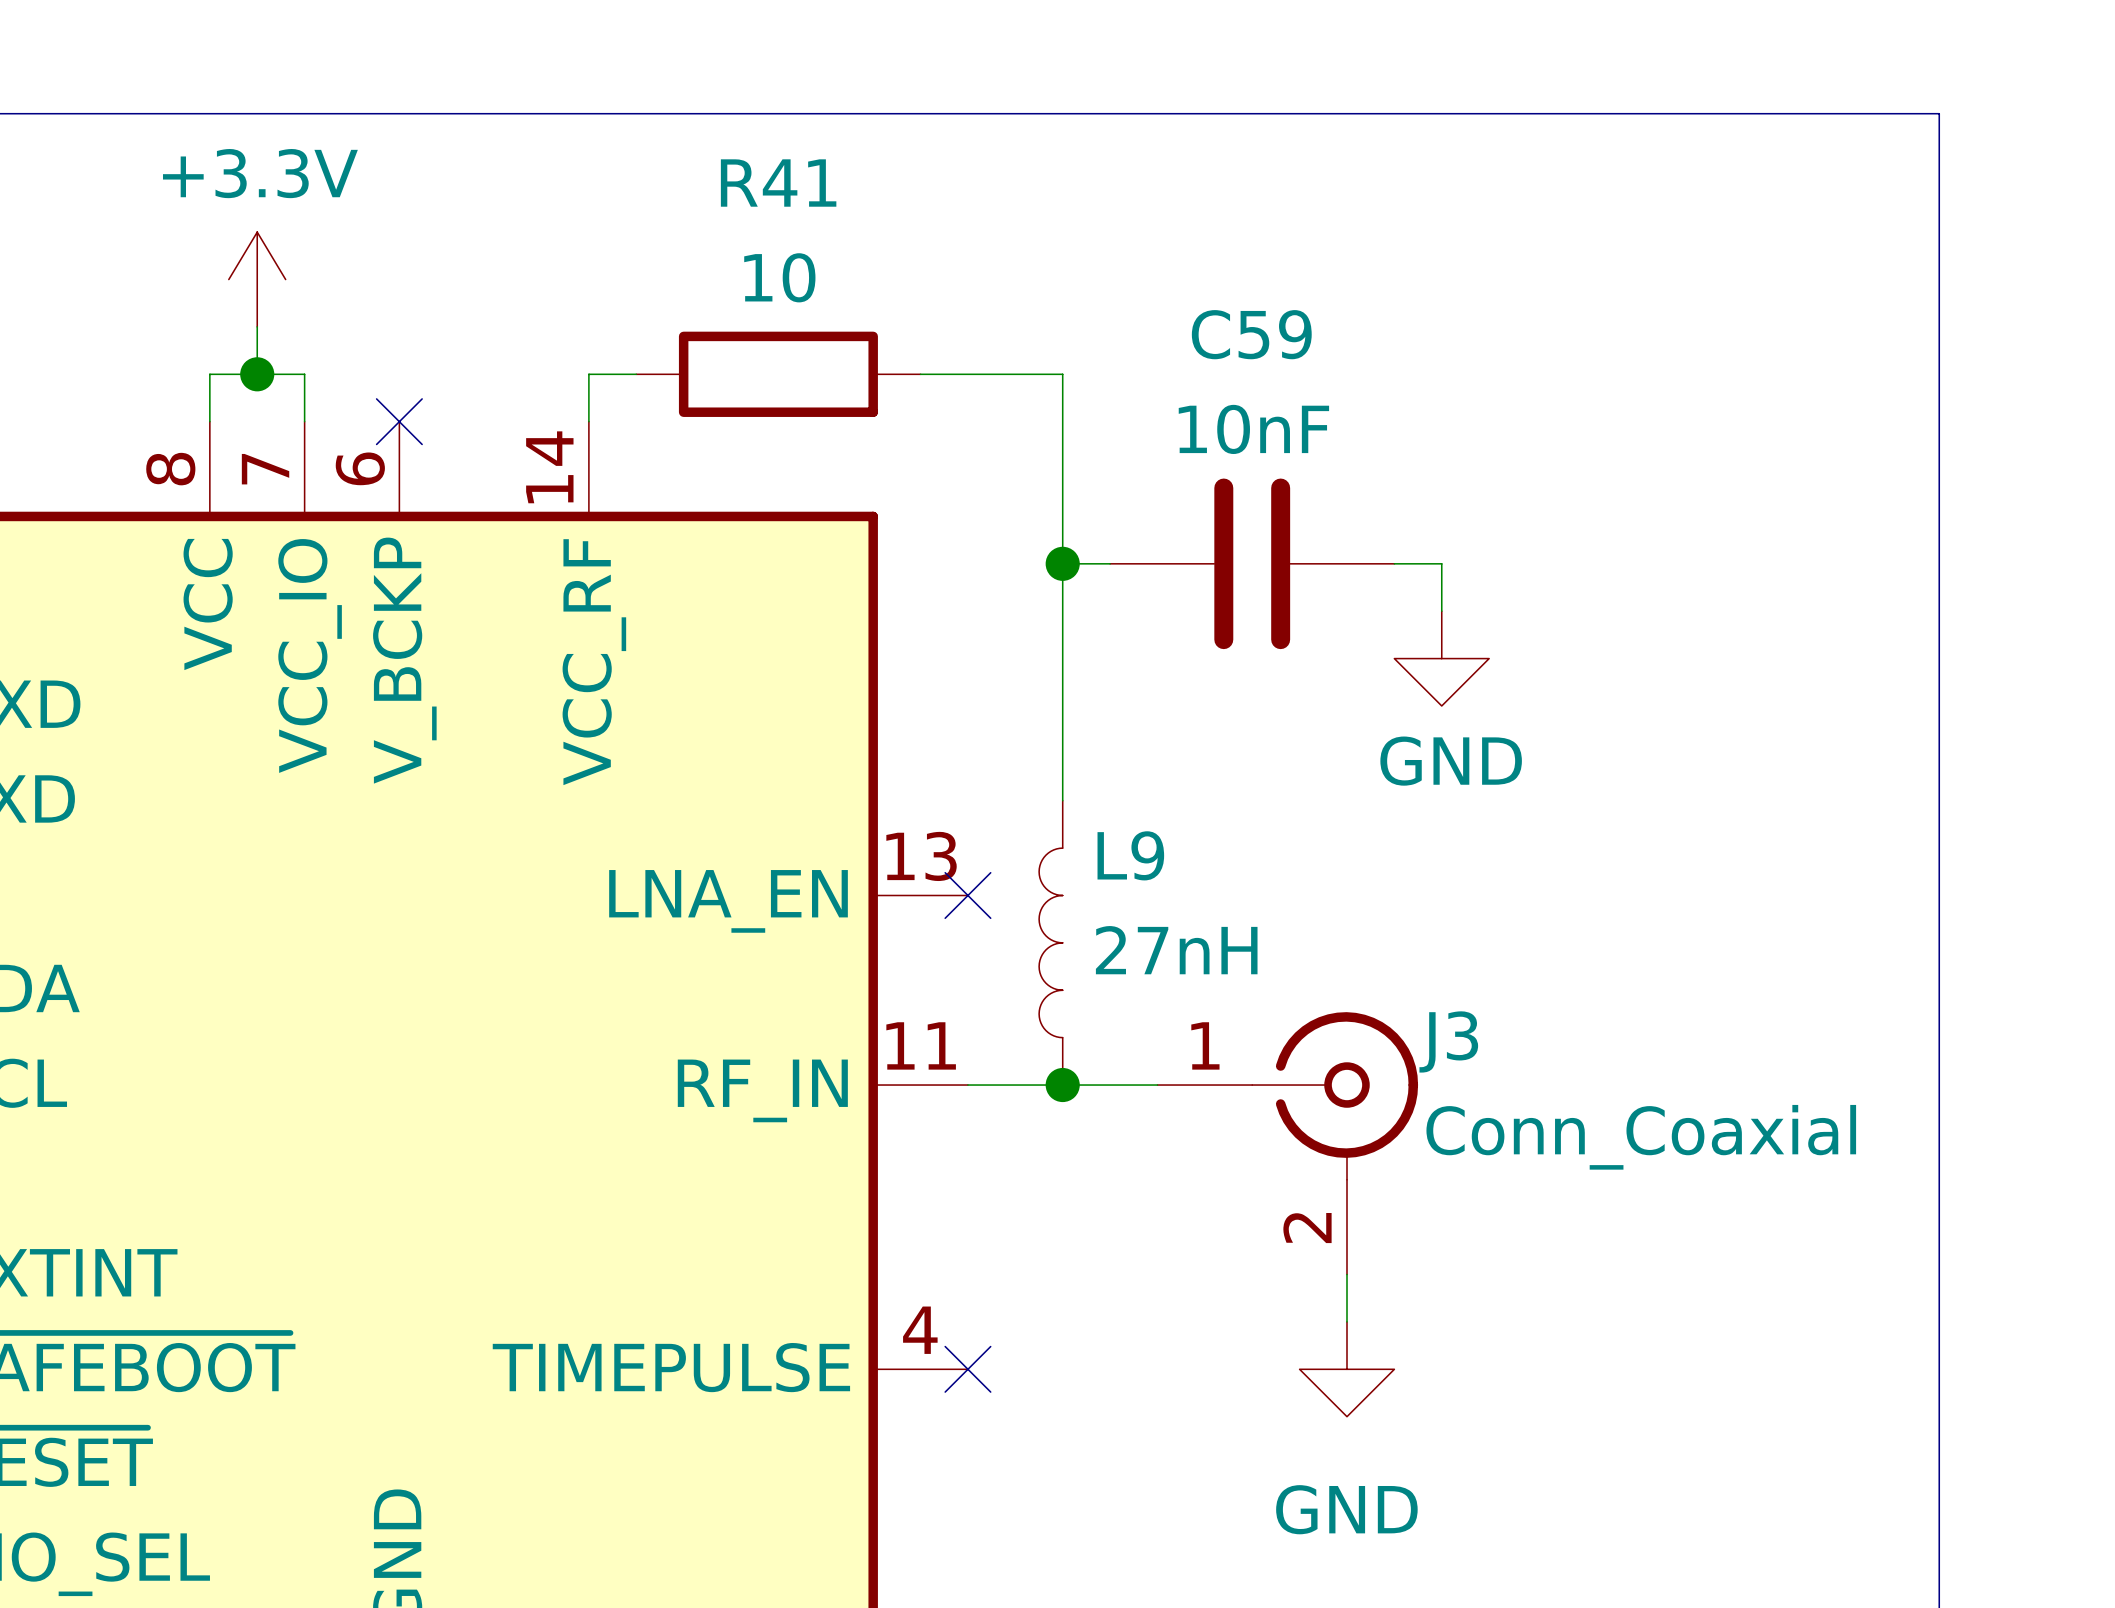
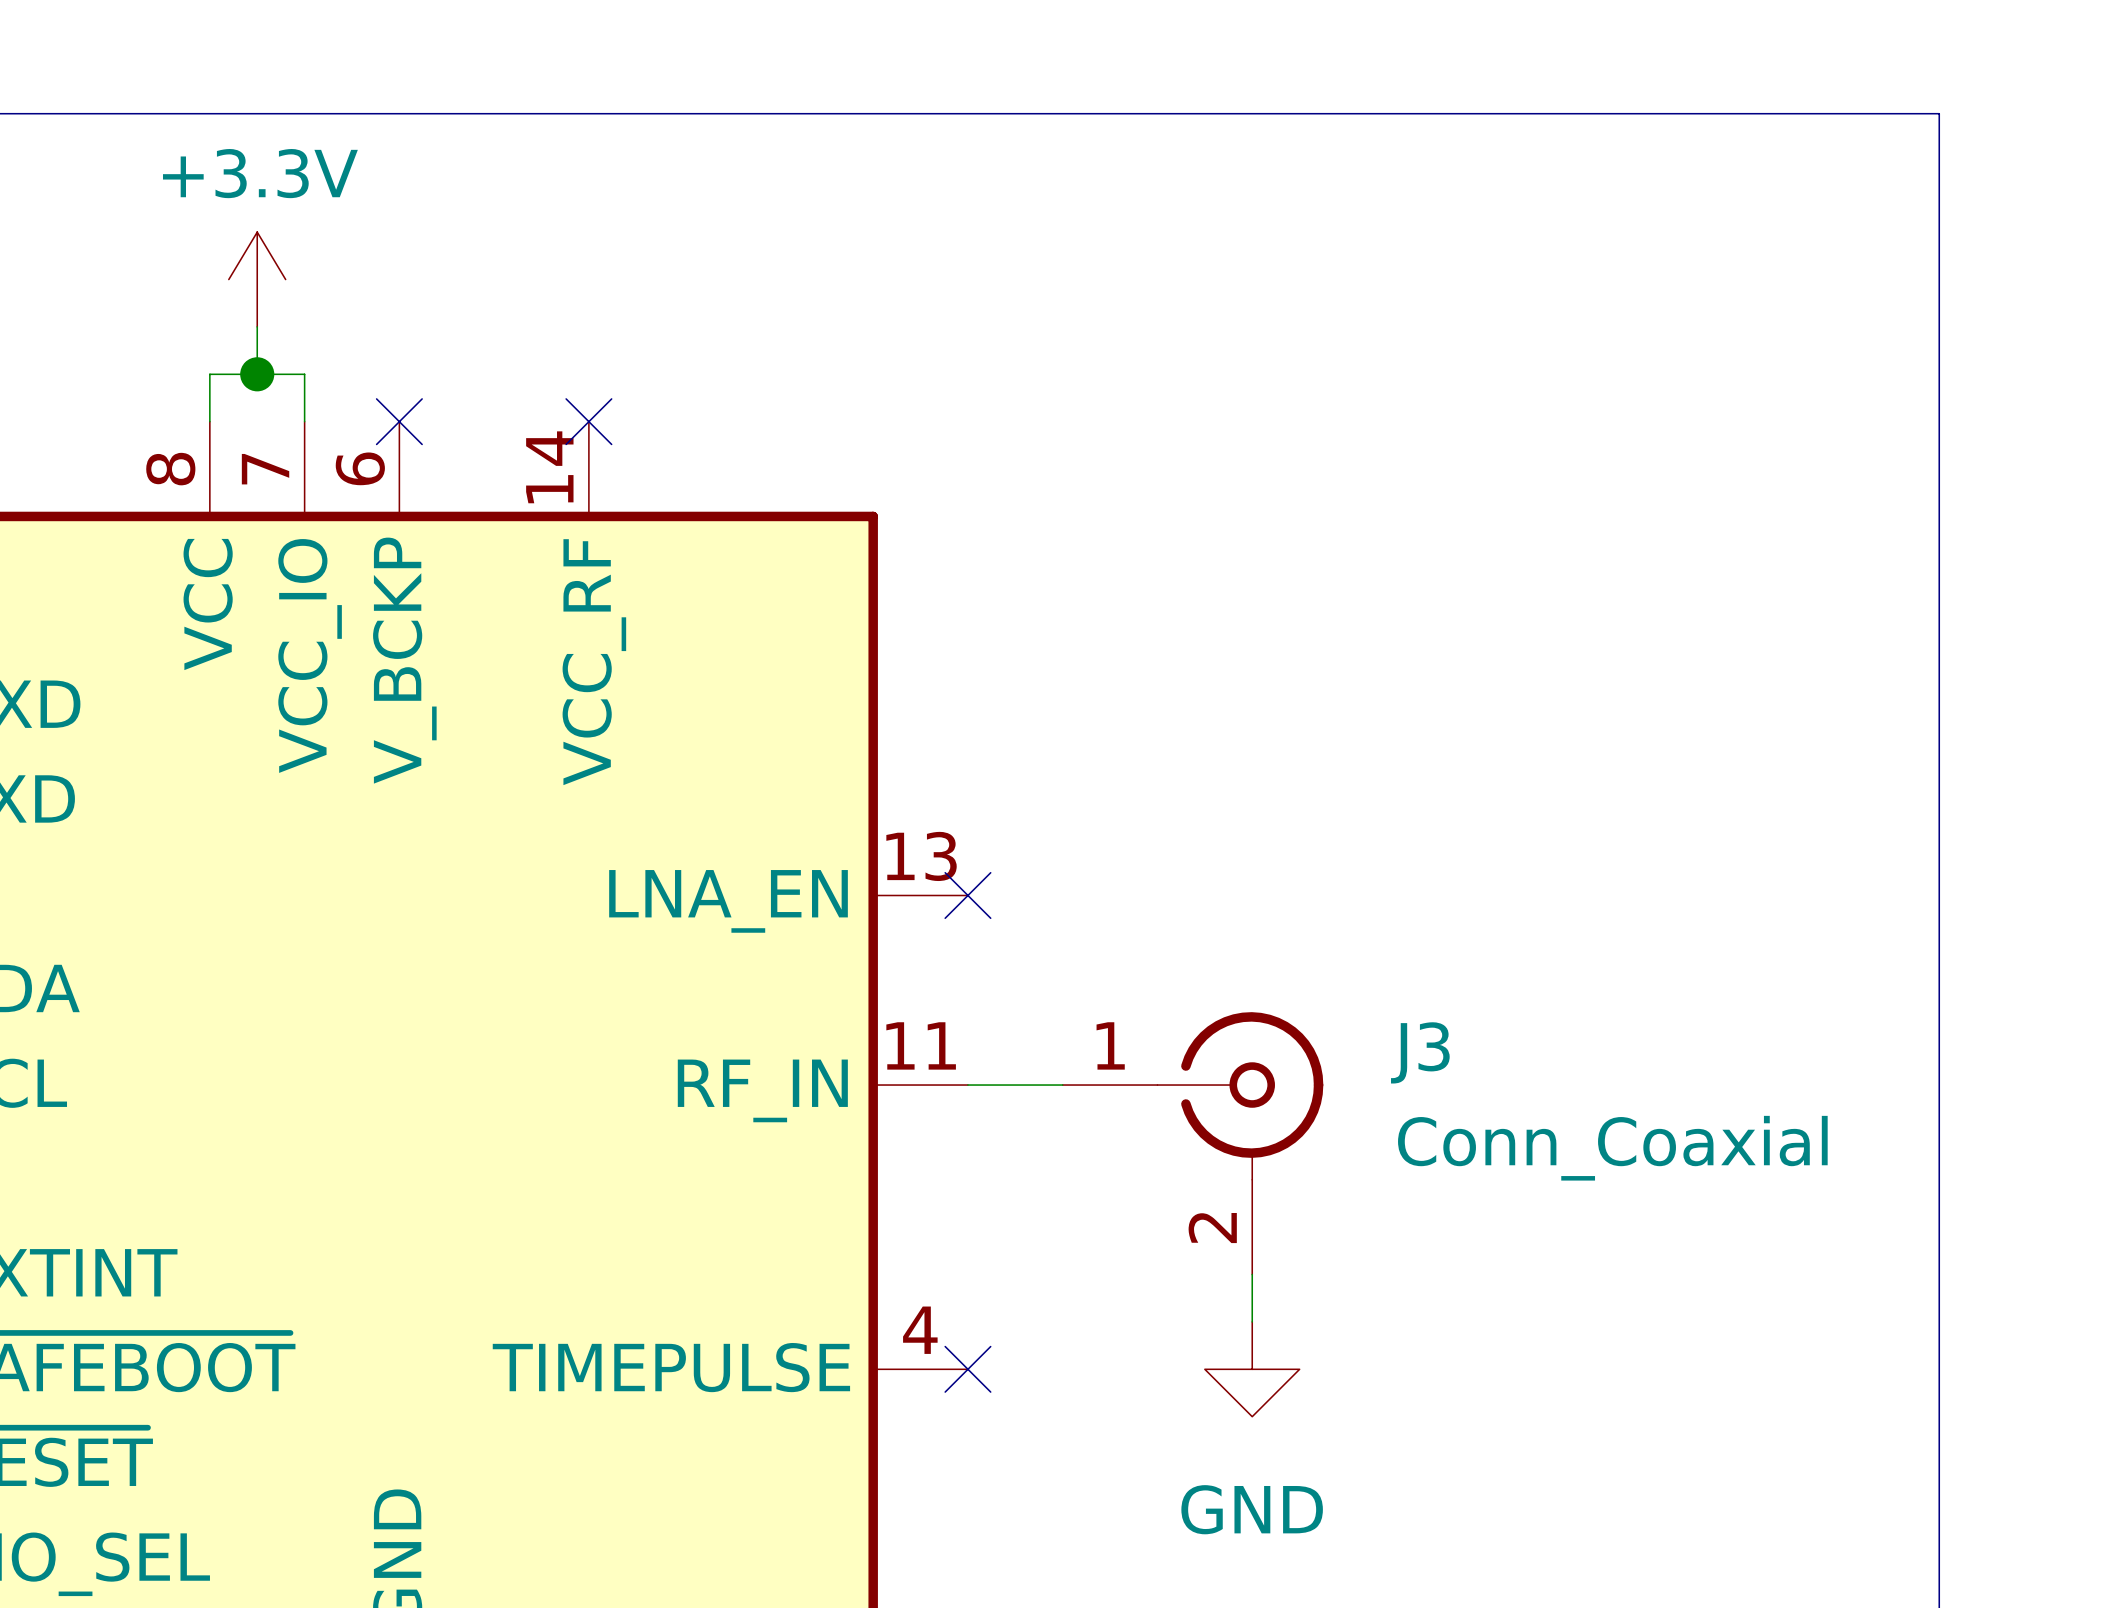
wire: (636, 374) (588, 374) (588, 421) -> none
R41: 10 (778, 374) -> none
wire: (920, 374) (1062, 374) (1062, 800) -> none
no-connect mark: none -> (588, 421)
wire: (1062, 563) (1110, 563) -> none
junction: (1062, 563) -> none
C59: 10nF (1252, 563) -> none
wire: (1394, 563) (1441, 563) (1441, 611) -> none
power symbol: GND (1441, 658) -> none
L9: 27nH (1050, 942) -> none
J3 name position: J3 (1448, 1041) -> J3 (1420, 1052)
junction: (1062, 1085) -> none
J3 value position: Conn_Coaxial (1641, 1137) -> Conn_Coaxial (1612, 1148)
J3 position: (1287, 1143) -> (1193, 1143)
wire: (1346, 1274) (1346, 1321) -> (1252, 1274) (1252, 1321)
power symbol position: GND (1346, 1369) -> GND (1252, 1369)

